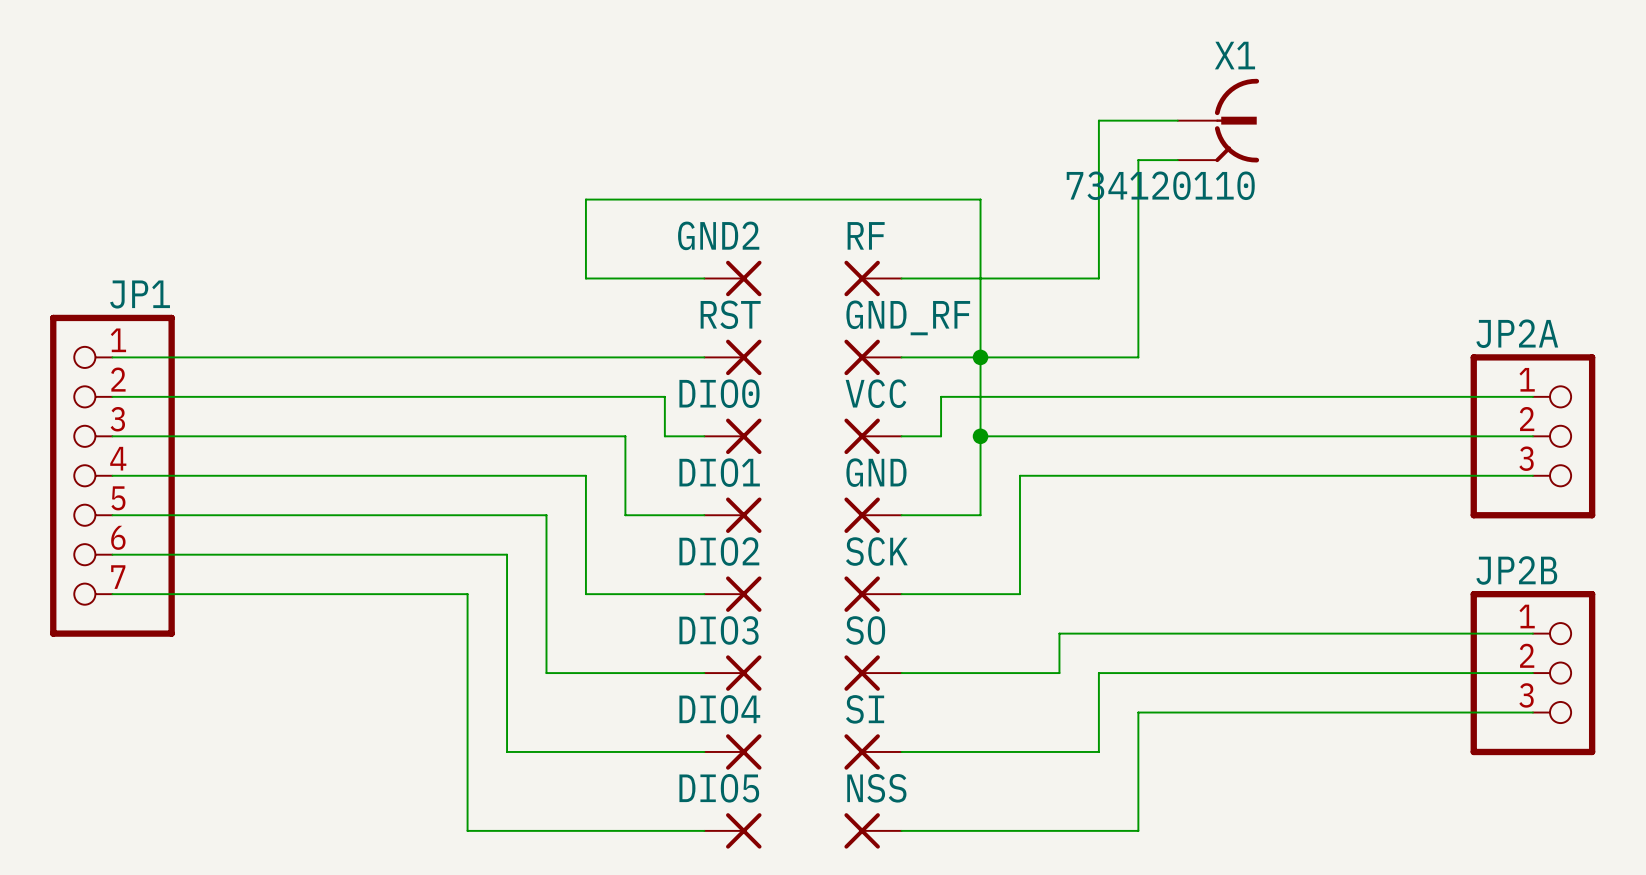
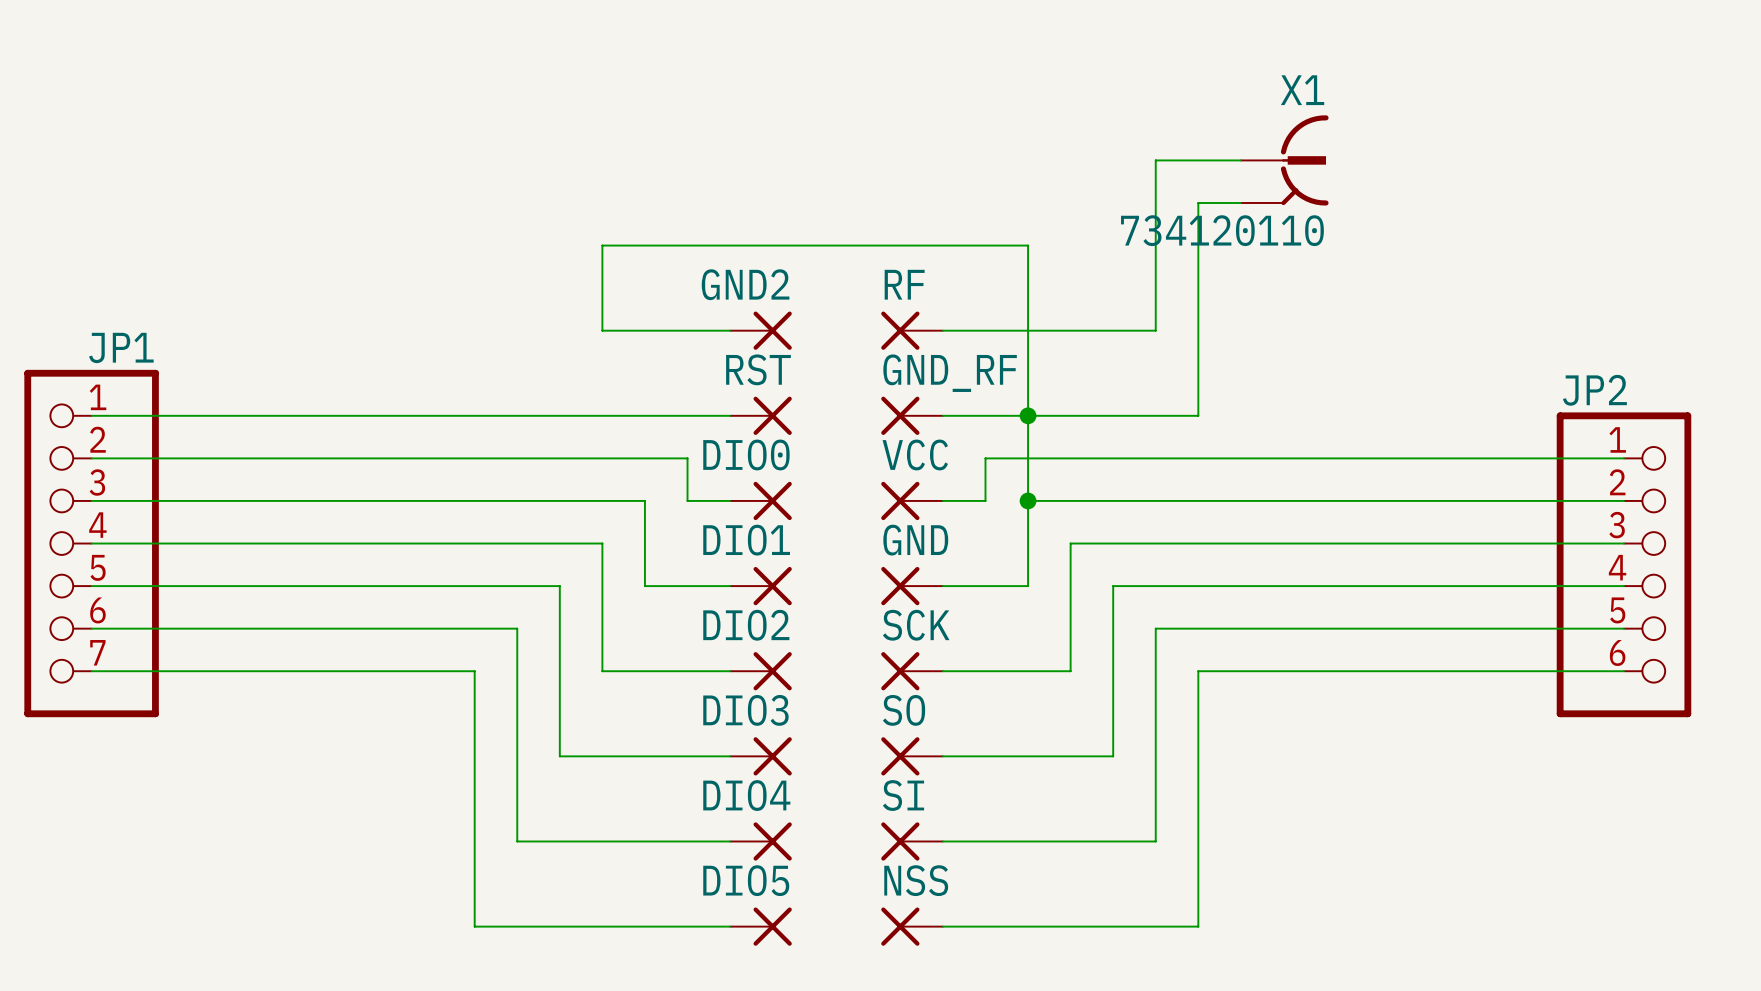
JP2A: (1532, 436) -> none
JP2: none -> (1623, 564)
wire: (1059, 633) (1532, 633) -> (1113, 713) (1113, 586) (1623, 586)
wire: (1098, 673) (1532, 673) -> (1155, 756) (1155, 628) (1623, 628)
JP2B: (1532, 673) -> none
wire: (1138, 712) (1532, 712) -> (1198, 798) (1198, 671) (1623, 671)

